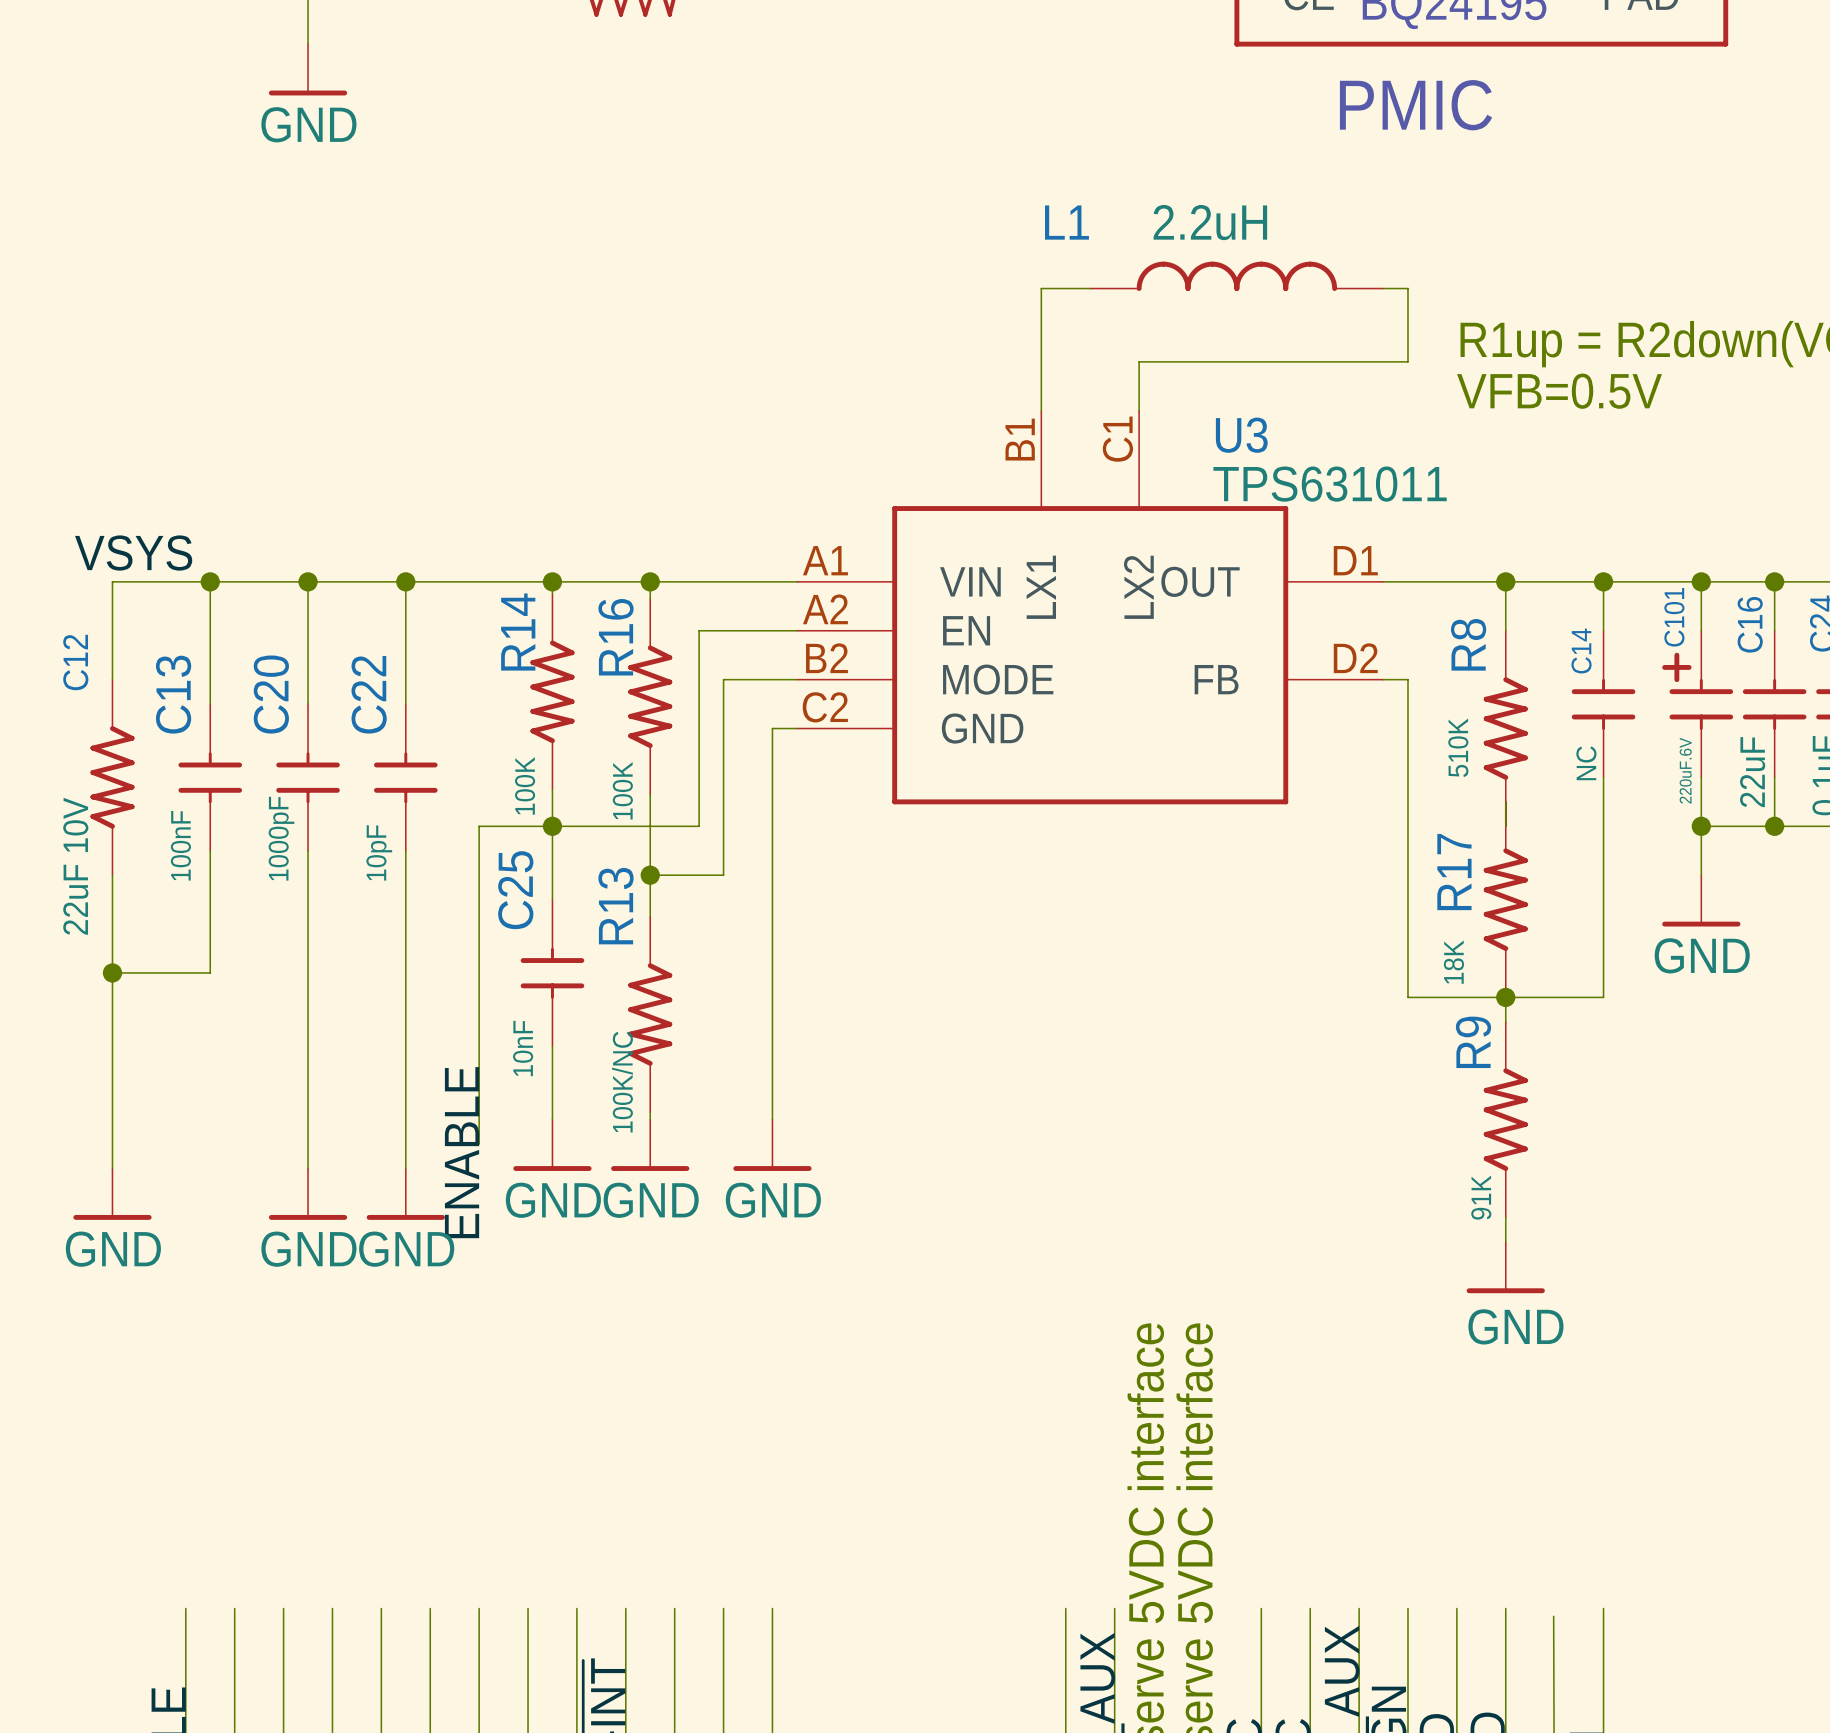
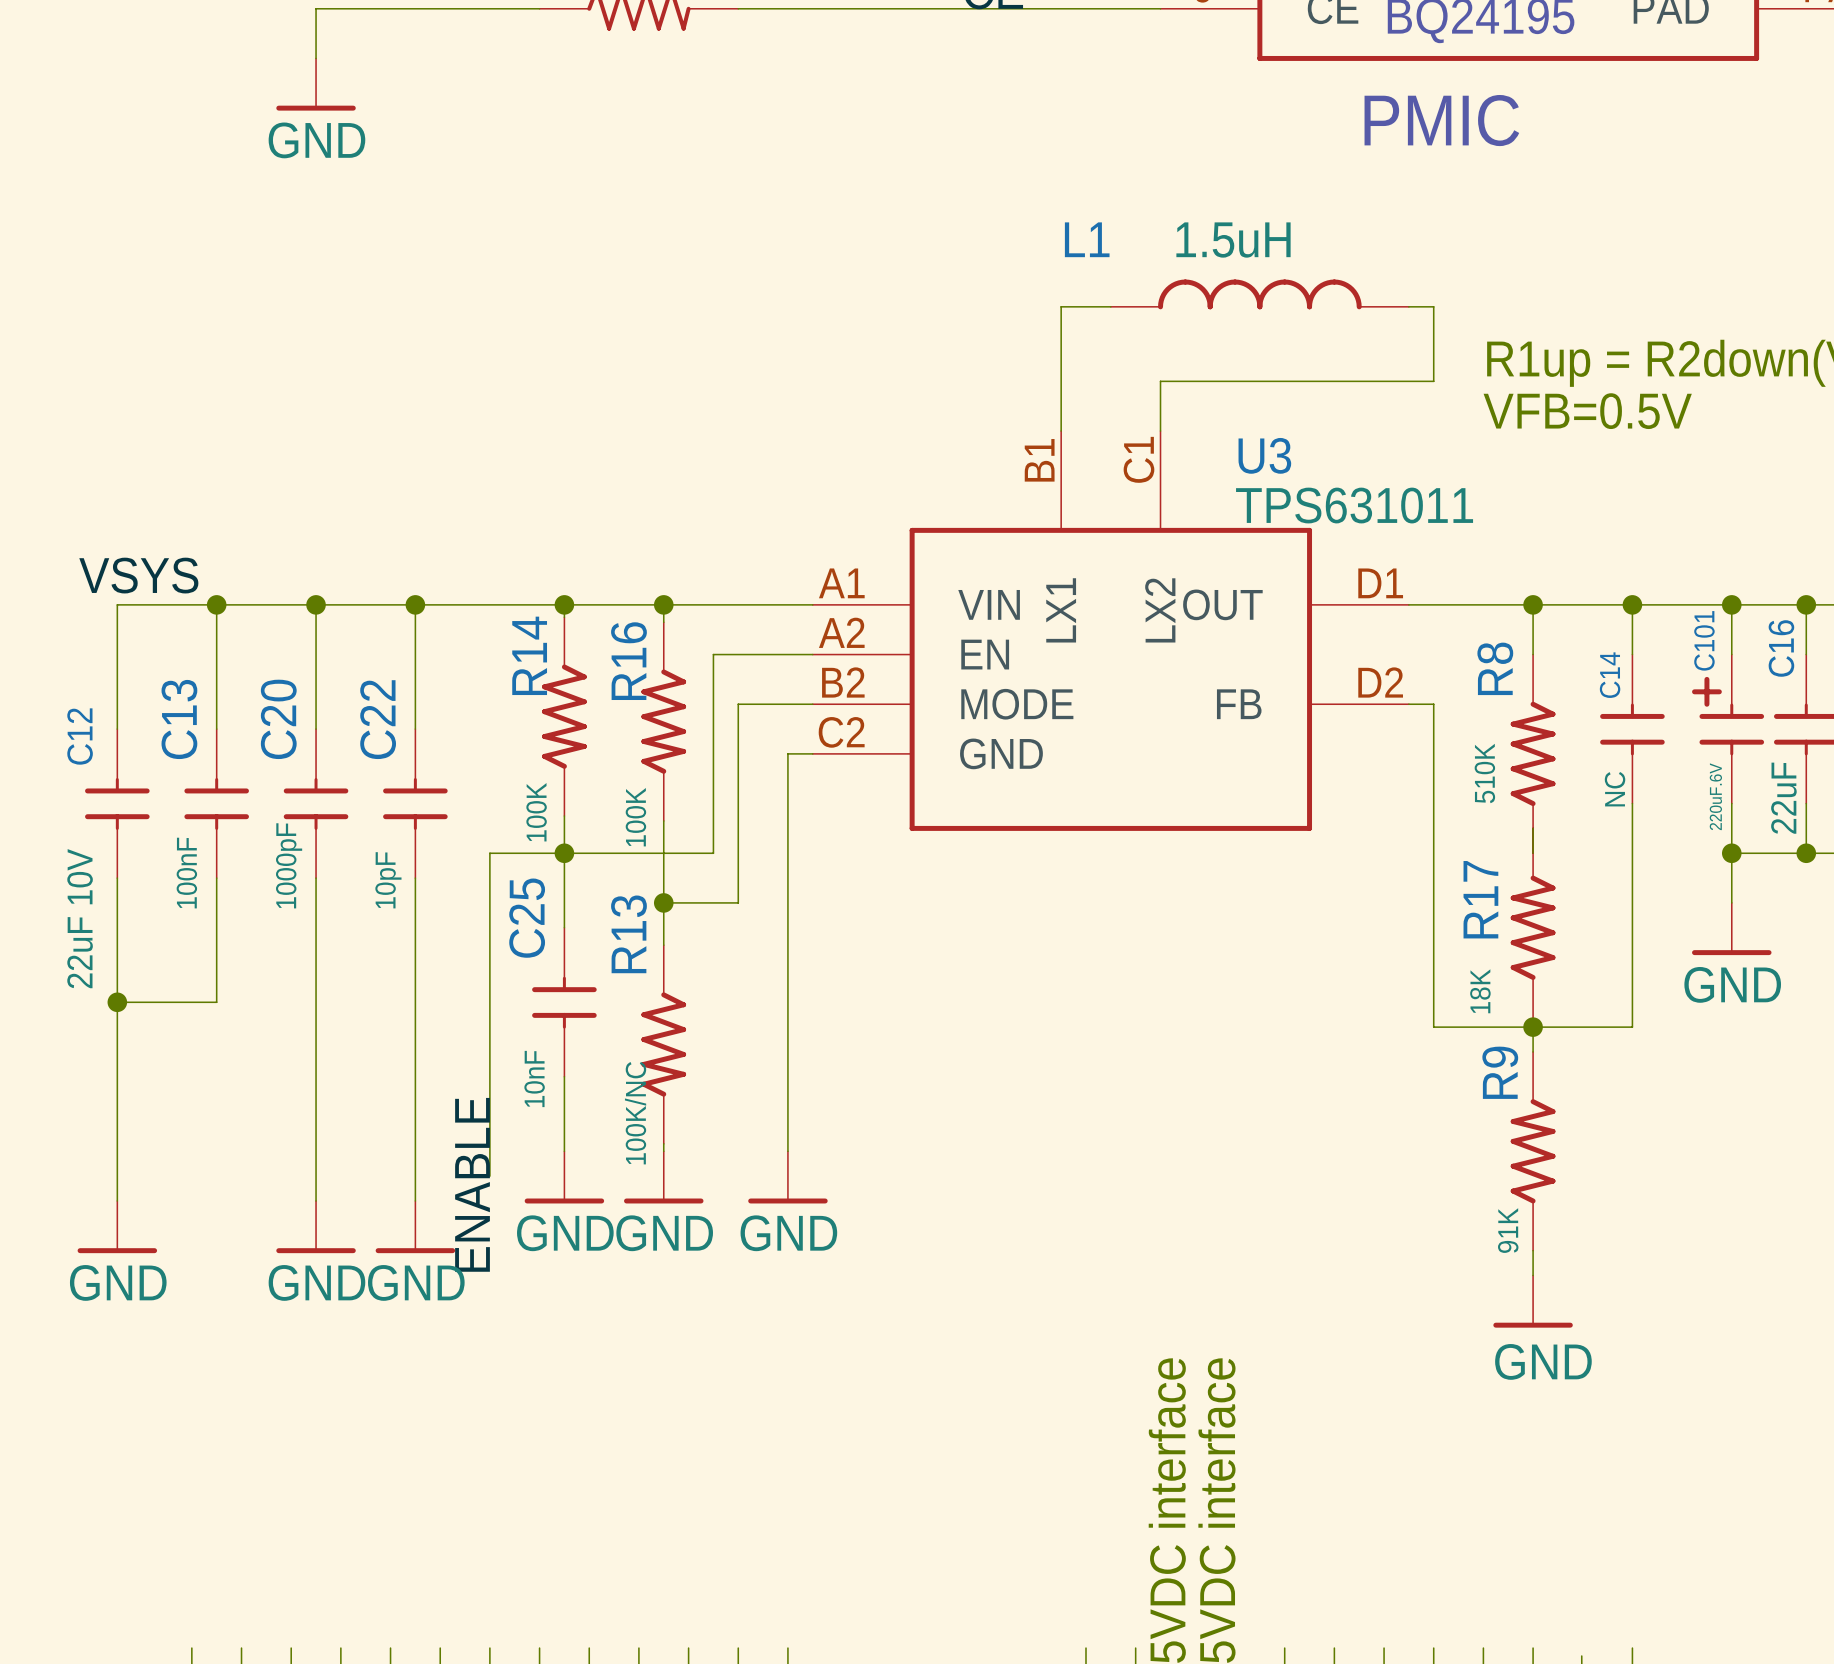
L1 value: 2.2uH (1210, 222) -> 1.5uH (1233, 240)
C12 name position: C12 (75, 662) -> C12 (80, 736)
C12 symbol: [90, 679, 135, 876] -> [85, 729, 150, 879]

